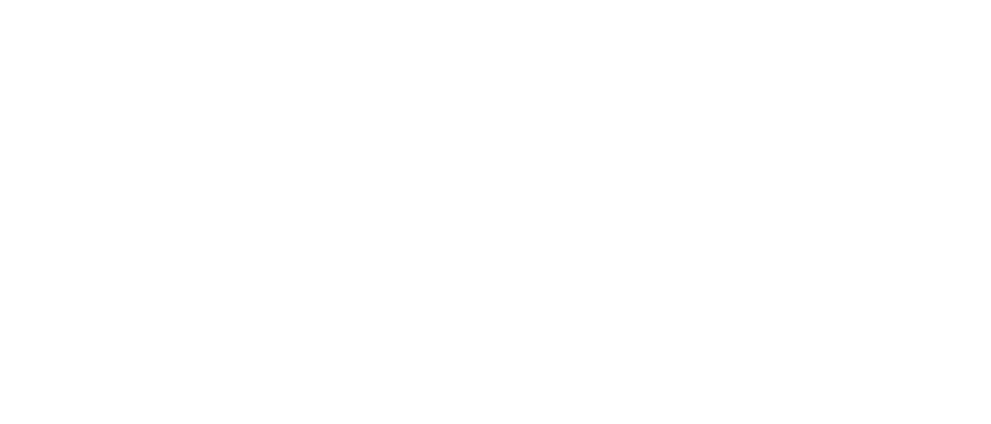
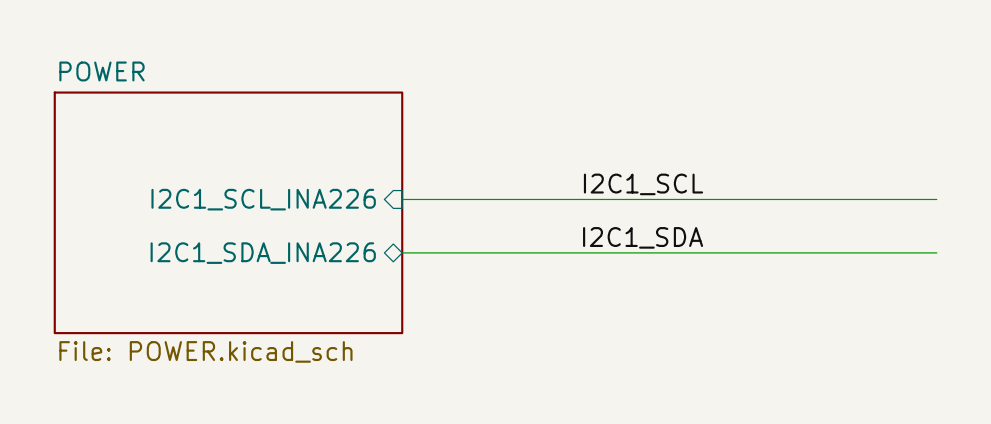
label: none -> I2C1_SCL (643, 184)
wire: none -> (402, 199) (936, 199)
sheet pin: none -> I2C1_SCL_INA226 (263, 199)
sheet POWER: none -> File: POWER.kicad_sch (228, 212)
label: none -> I2C1_SDA (643, 237)
wire: none -> (402, 252) (936, 252)
sheet pin: none -> I2C1_SDA_INA226 (263, 253)

